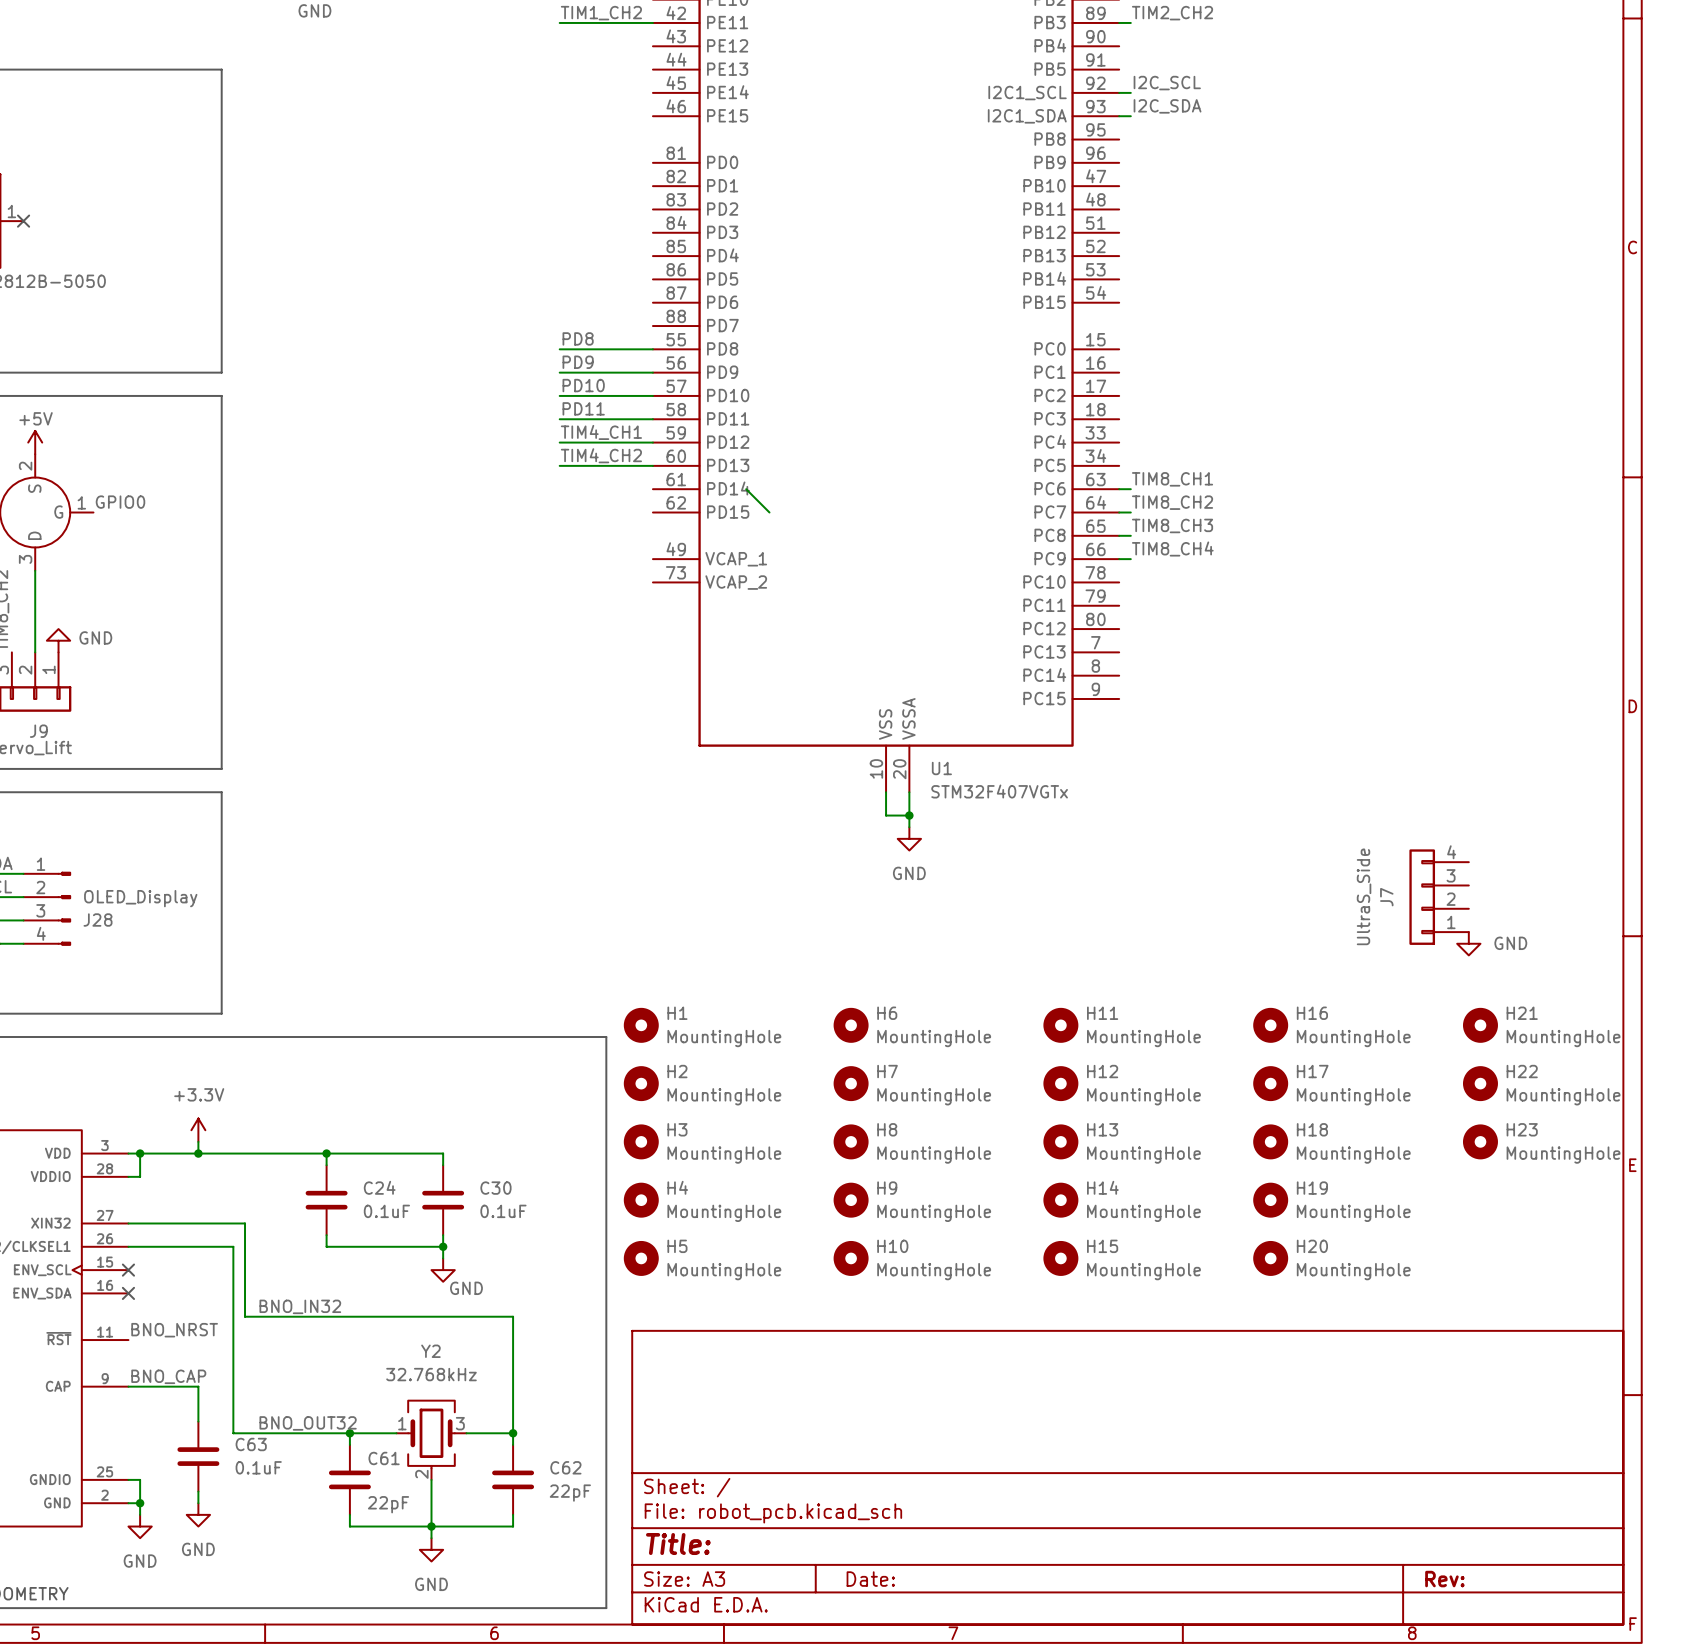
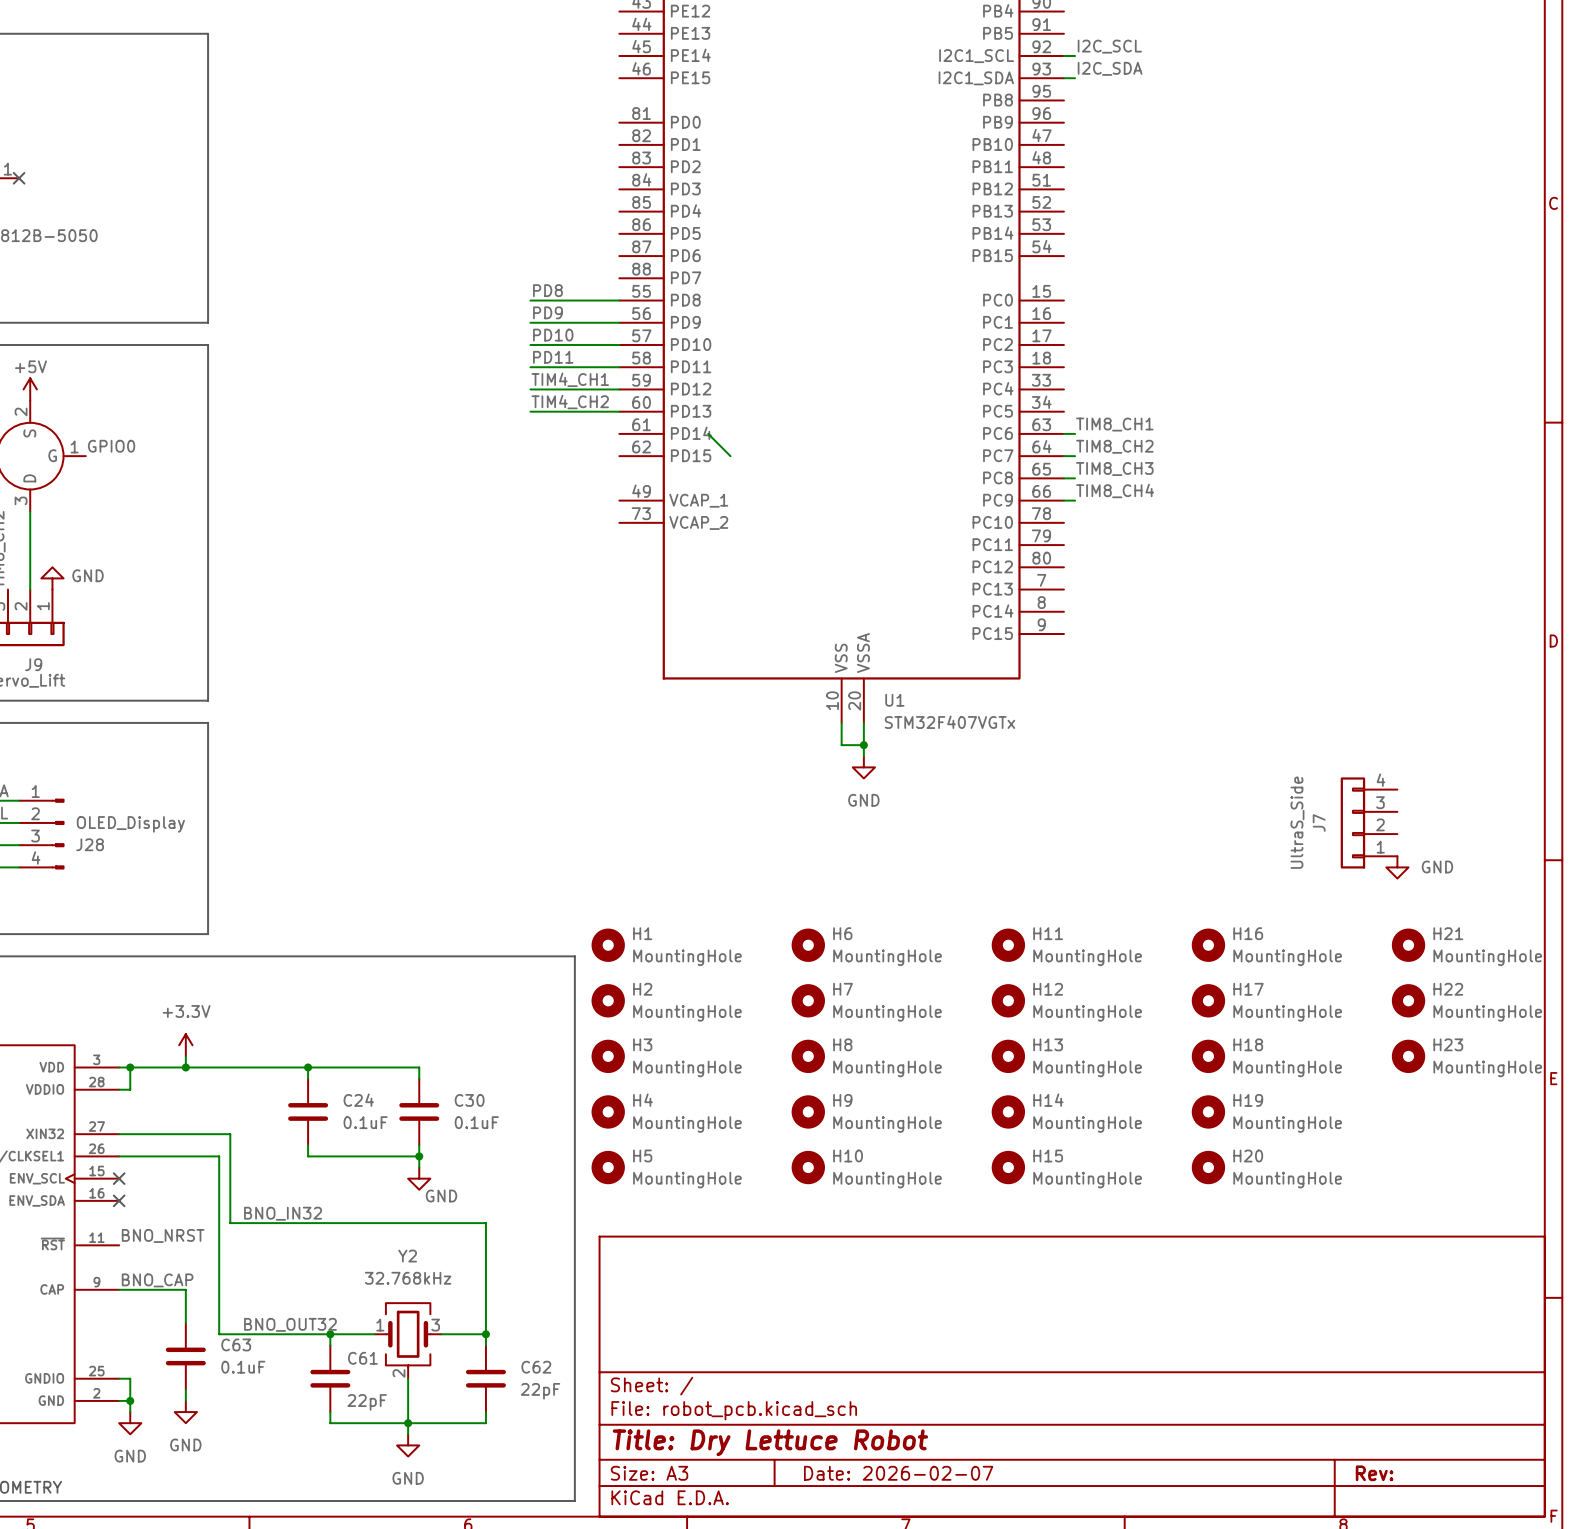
title block: Title: (678, 1544) -> Title: Dry Lettuce Robot (770, 1442)
title block: Date: (870, 1579) -> Date: 2026-02-07 (898, 1473)

